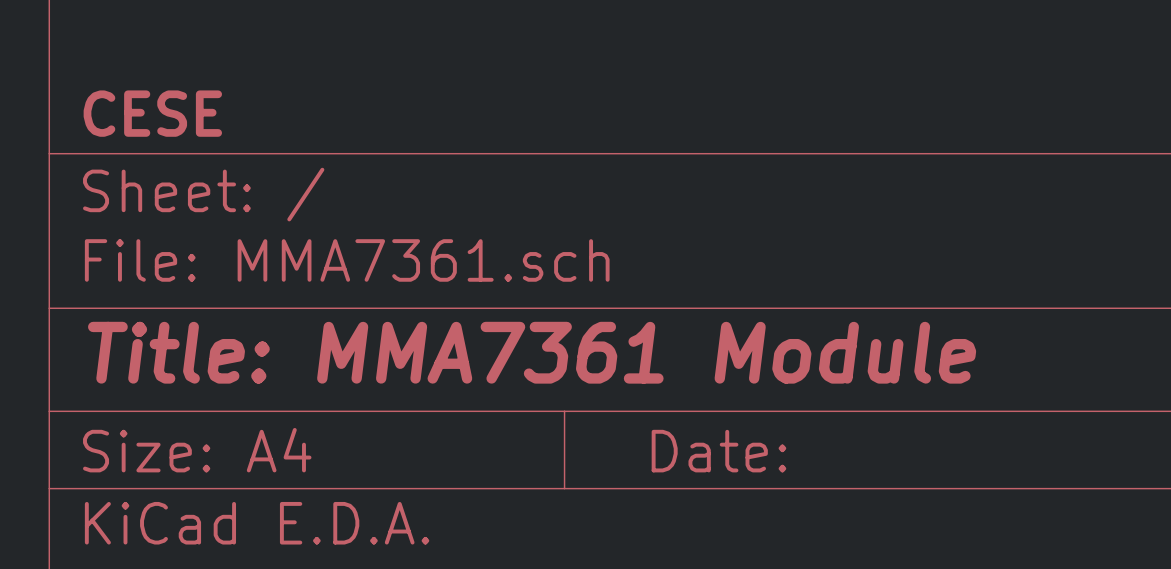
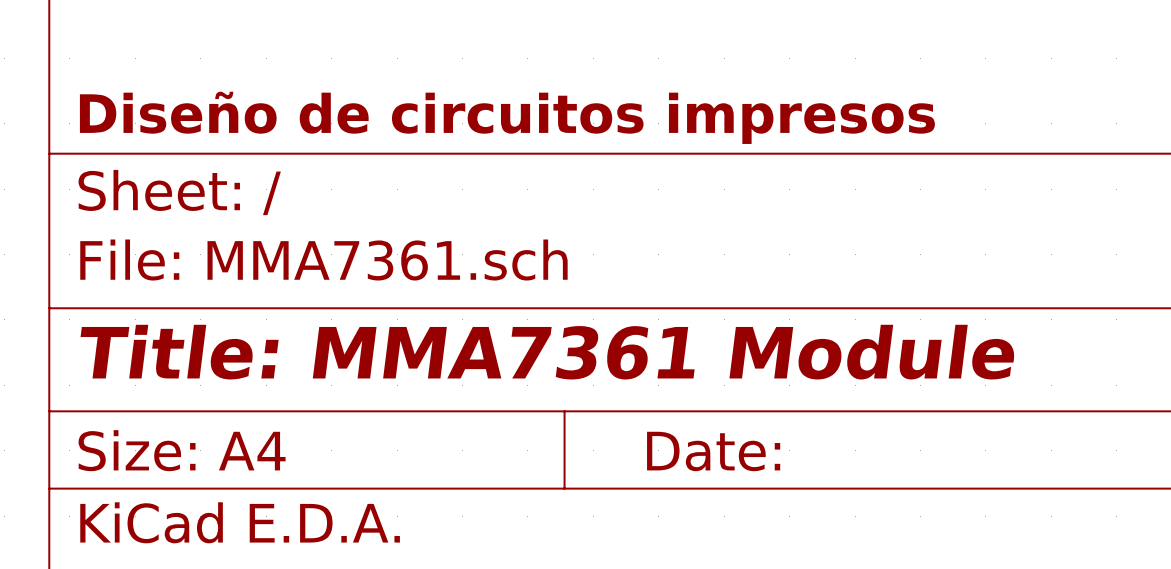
title block: CESE (152, 113) -> Diseño de circuitos impresos (507, 117)

